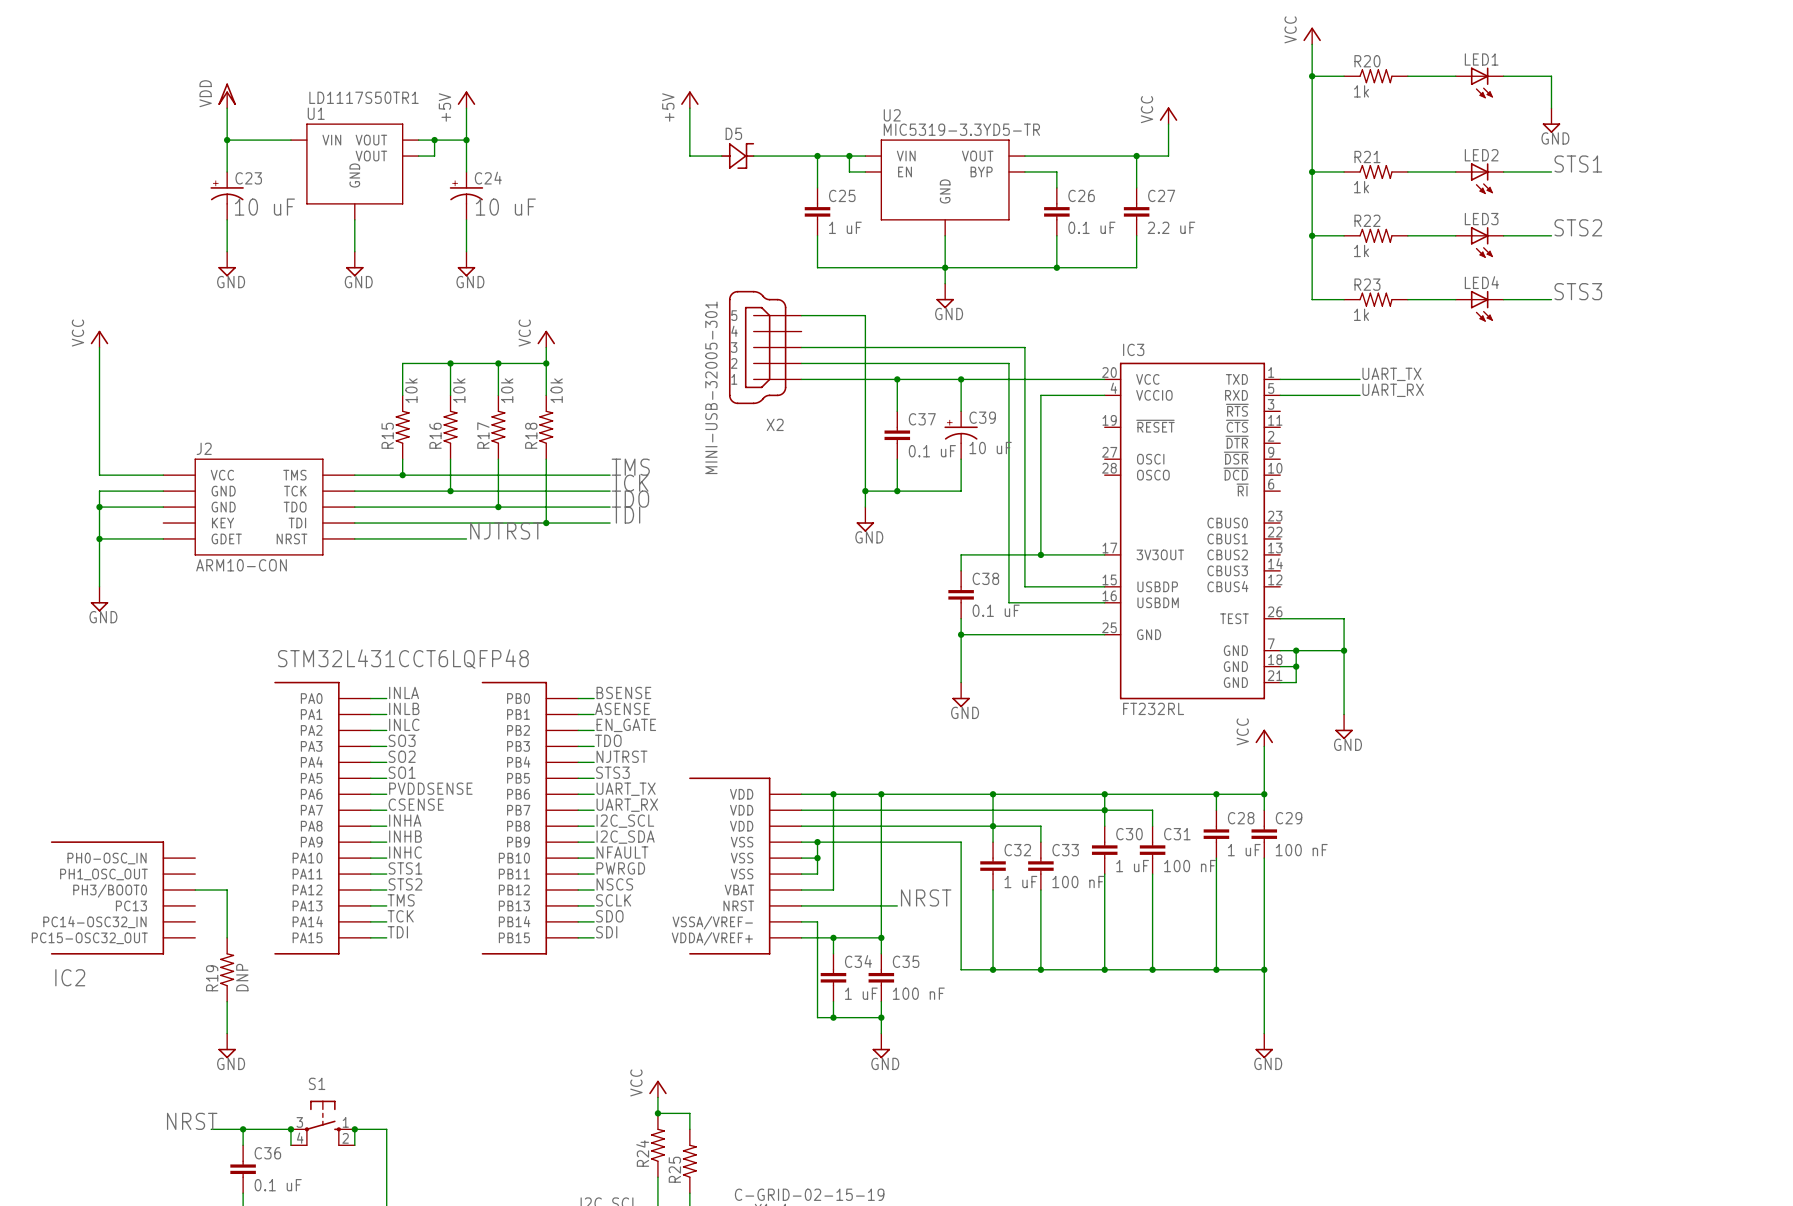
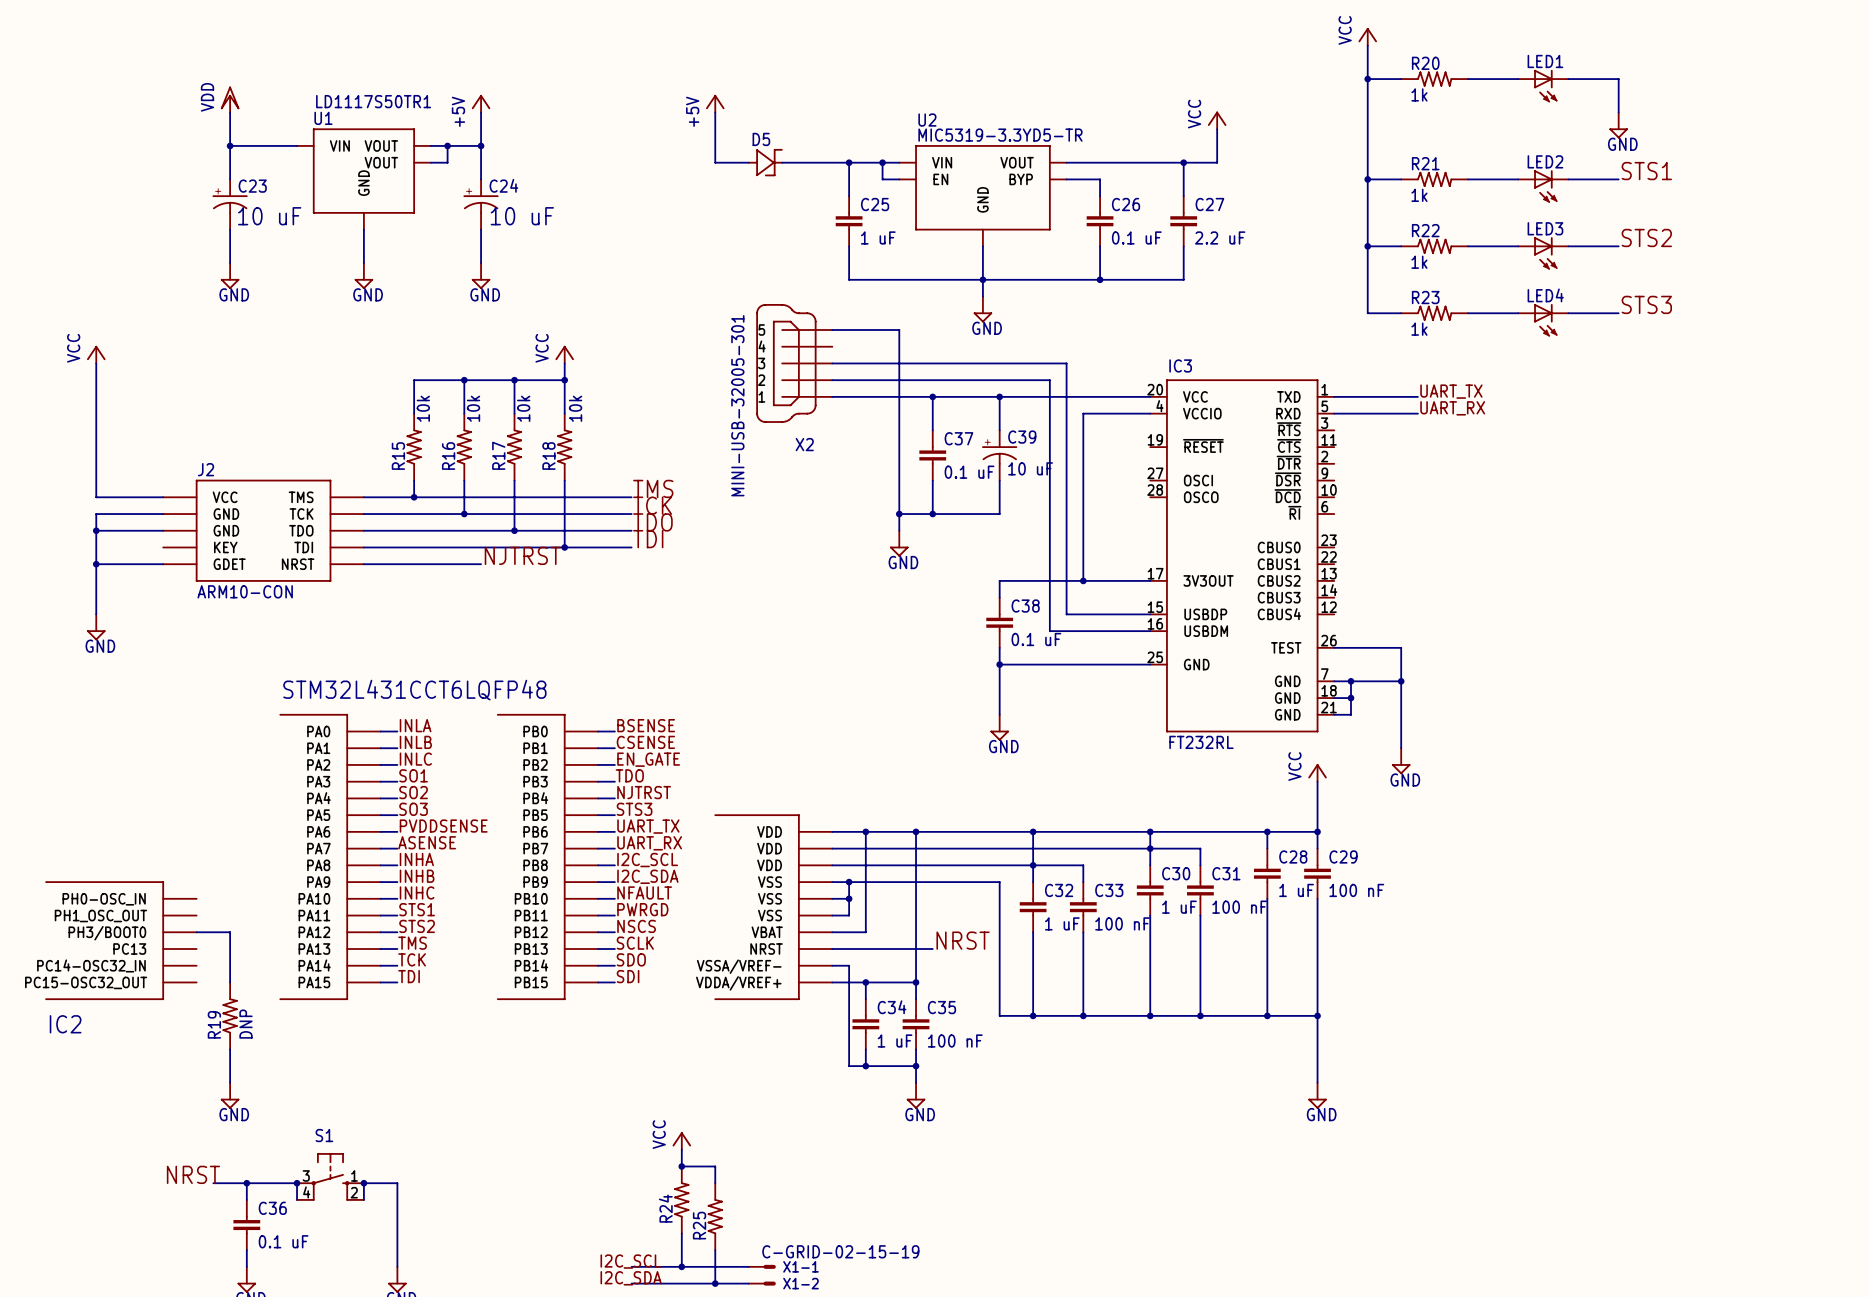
label: ASENSE (622, 708) -> CSENSE (645, 742)
label: SO3 (402, 740) -> SO1 (413, 775)
label: SO1 (402, 772) -> SO3 (413, 809)
label: CSENSE (416, 804) -> ASENSE (427, 842)

